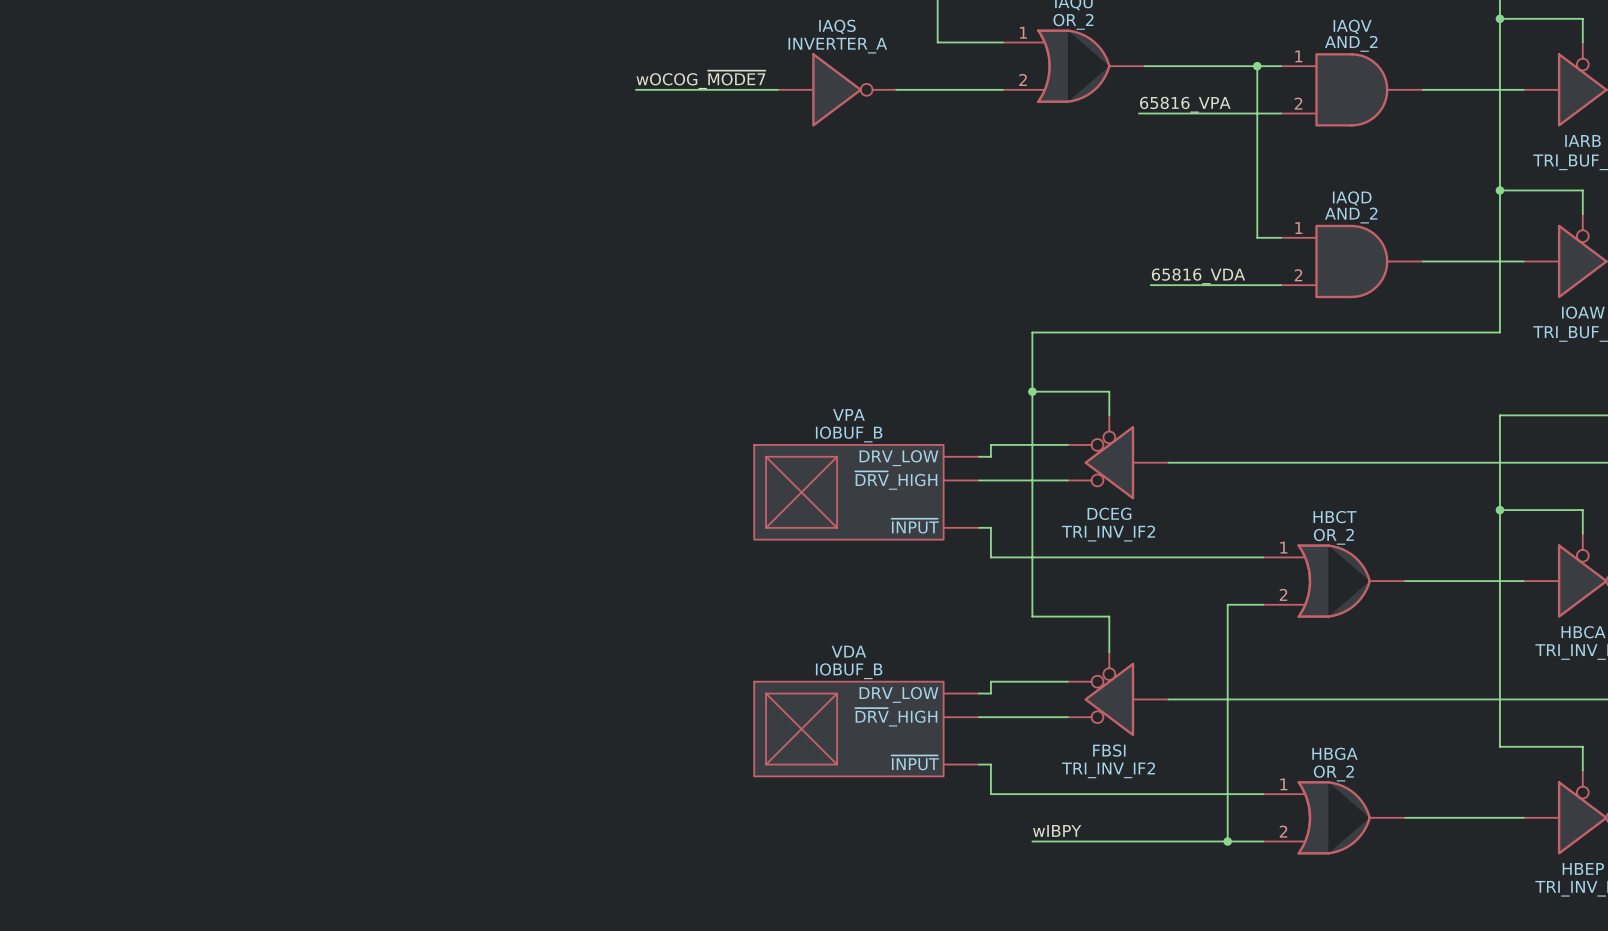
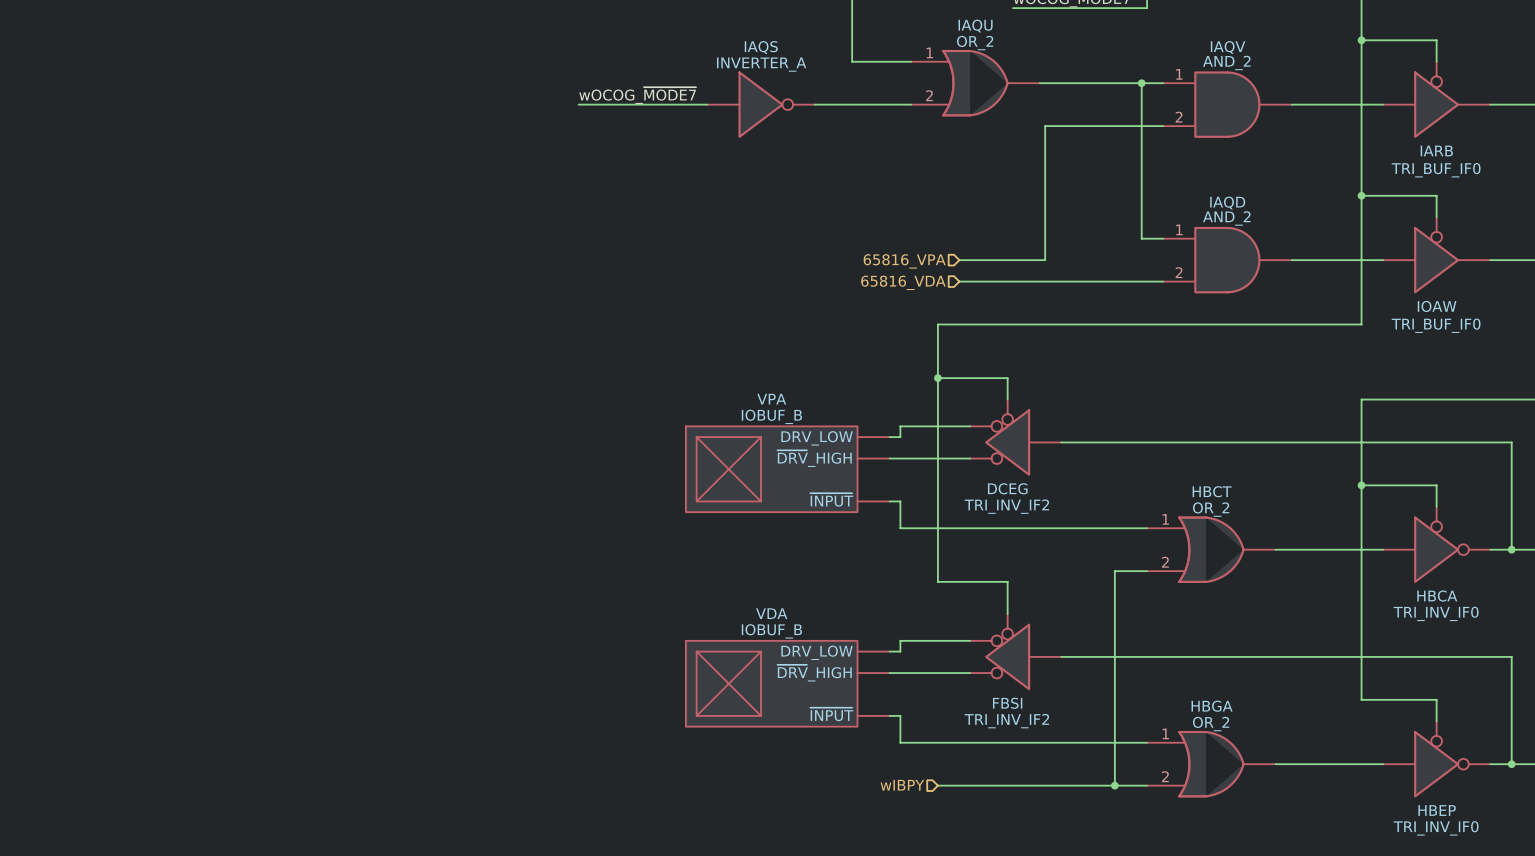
label: 65816_VPA (1185, 104) -> none
wire: (1138, 113) (1150, 113) -> (959, 260) (1045, 260) (1045, 126)
hierarchical label: none -> 65816_VPA (904, 261)
label: 65816_VDA (1198, 276) -> none
wire: none -> (959, 281) (1045, 281)
hierarchical label: none -> 65816_VDA (903, 282)
label: wIBPY (1057, 830) -> none
hierarchical label: none -> wIBPY (902, 785)

